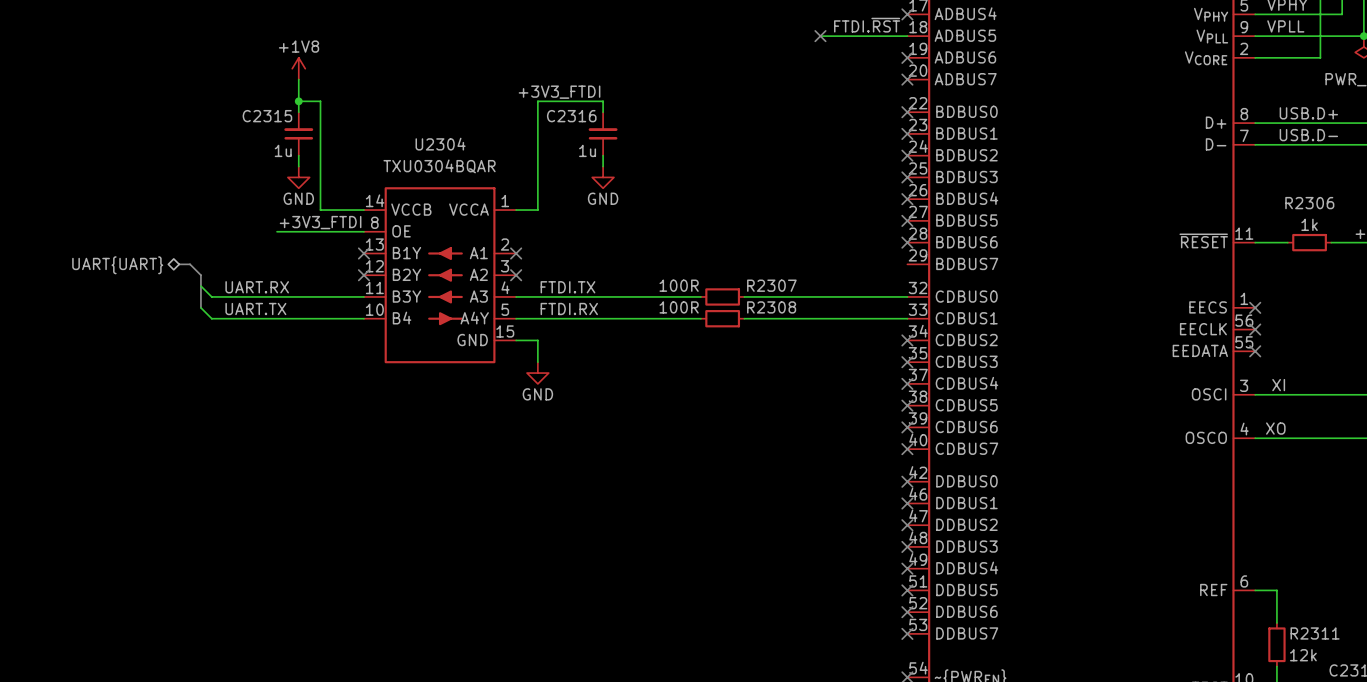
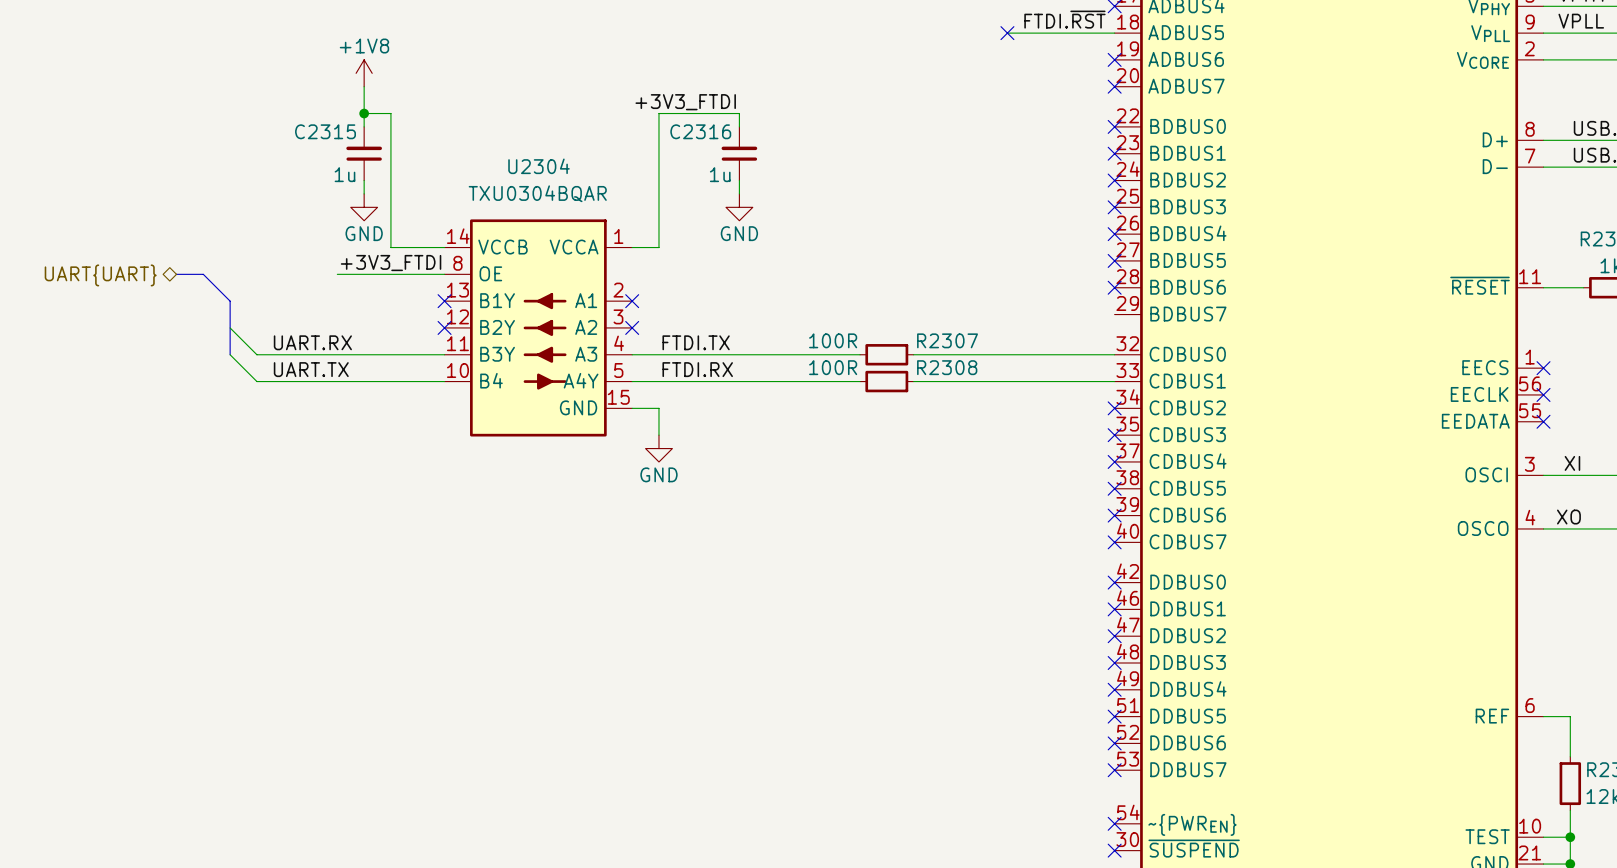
bus: none -> (176, 274) (203, 274) (230, 301) (230, 354)
bus: (179, 264) (190, 264) (200, 275) (200, 307) -> none
hierarchical label position: UART{UART} (117, 265) -> UART{UART} (100, 275)
wire: none -> (230, 327) (243, 341)
wire: none -> (230, 354) (243, 368)

